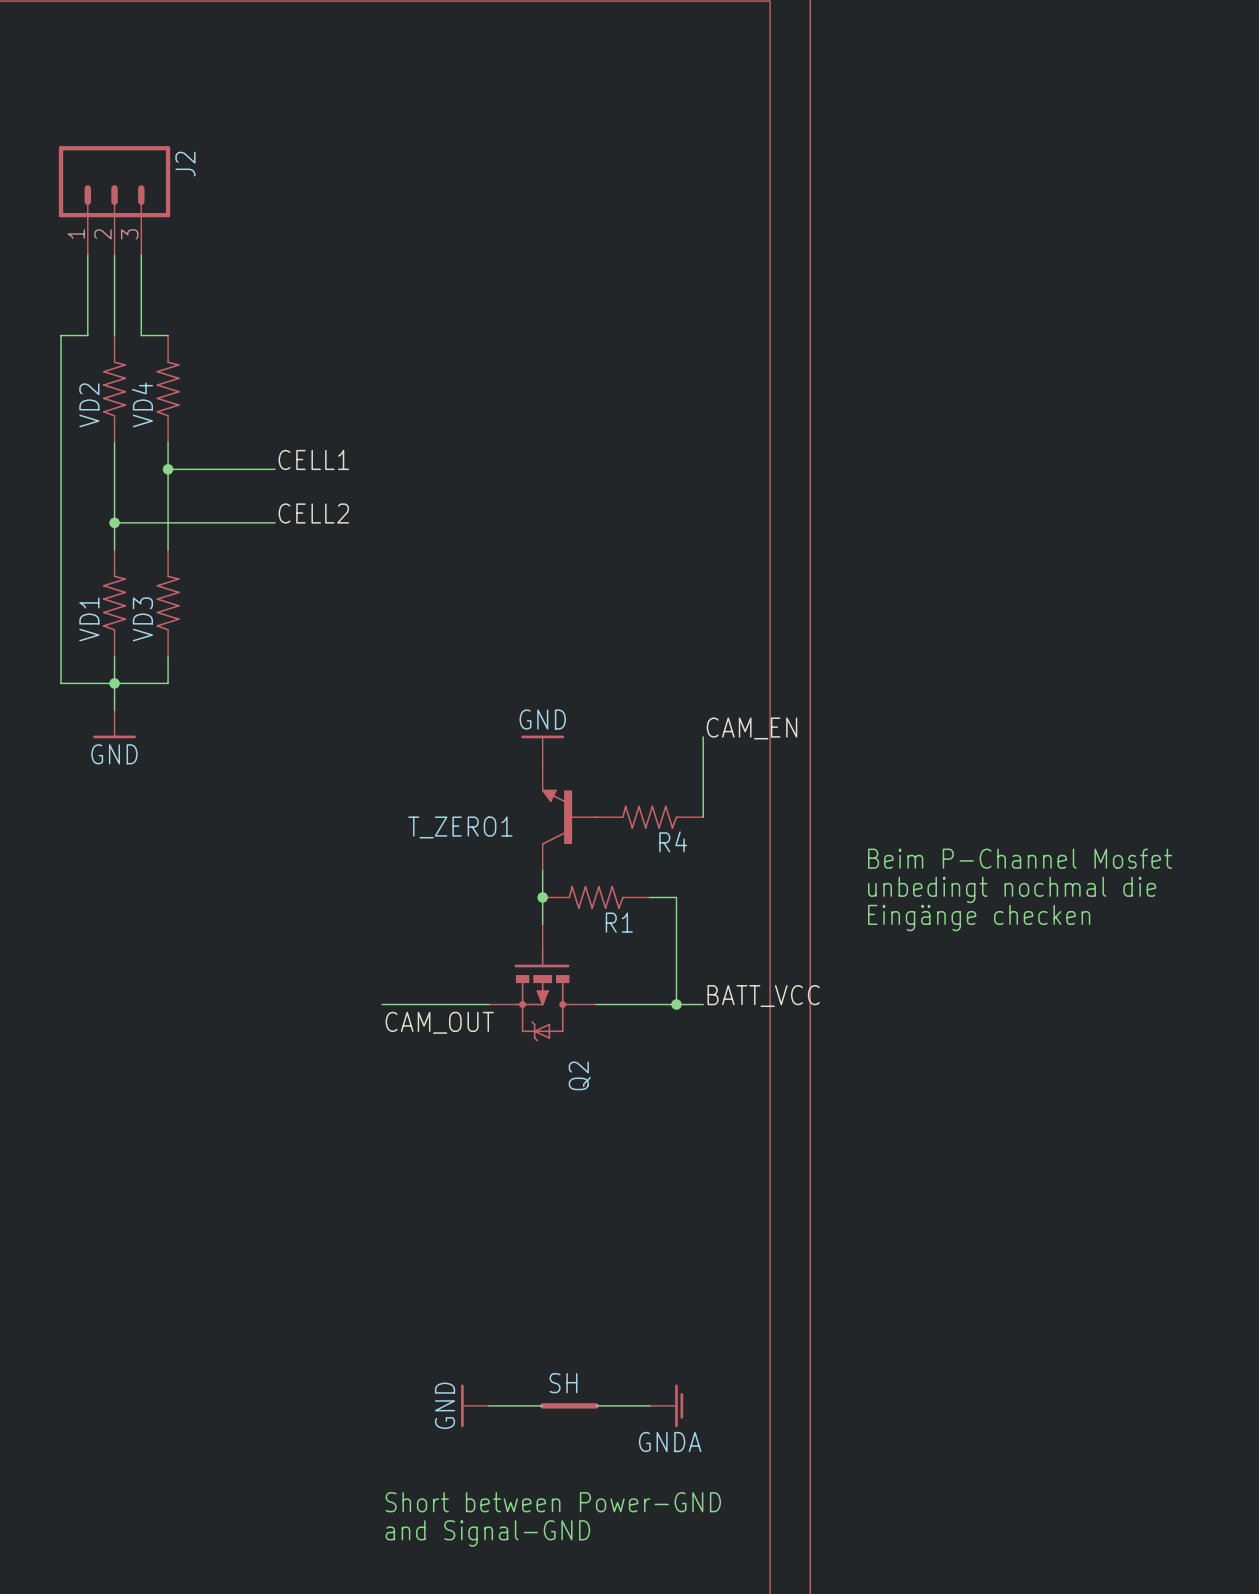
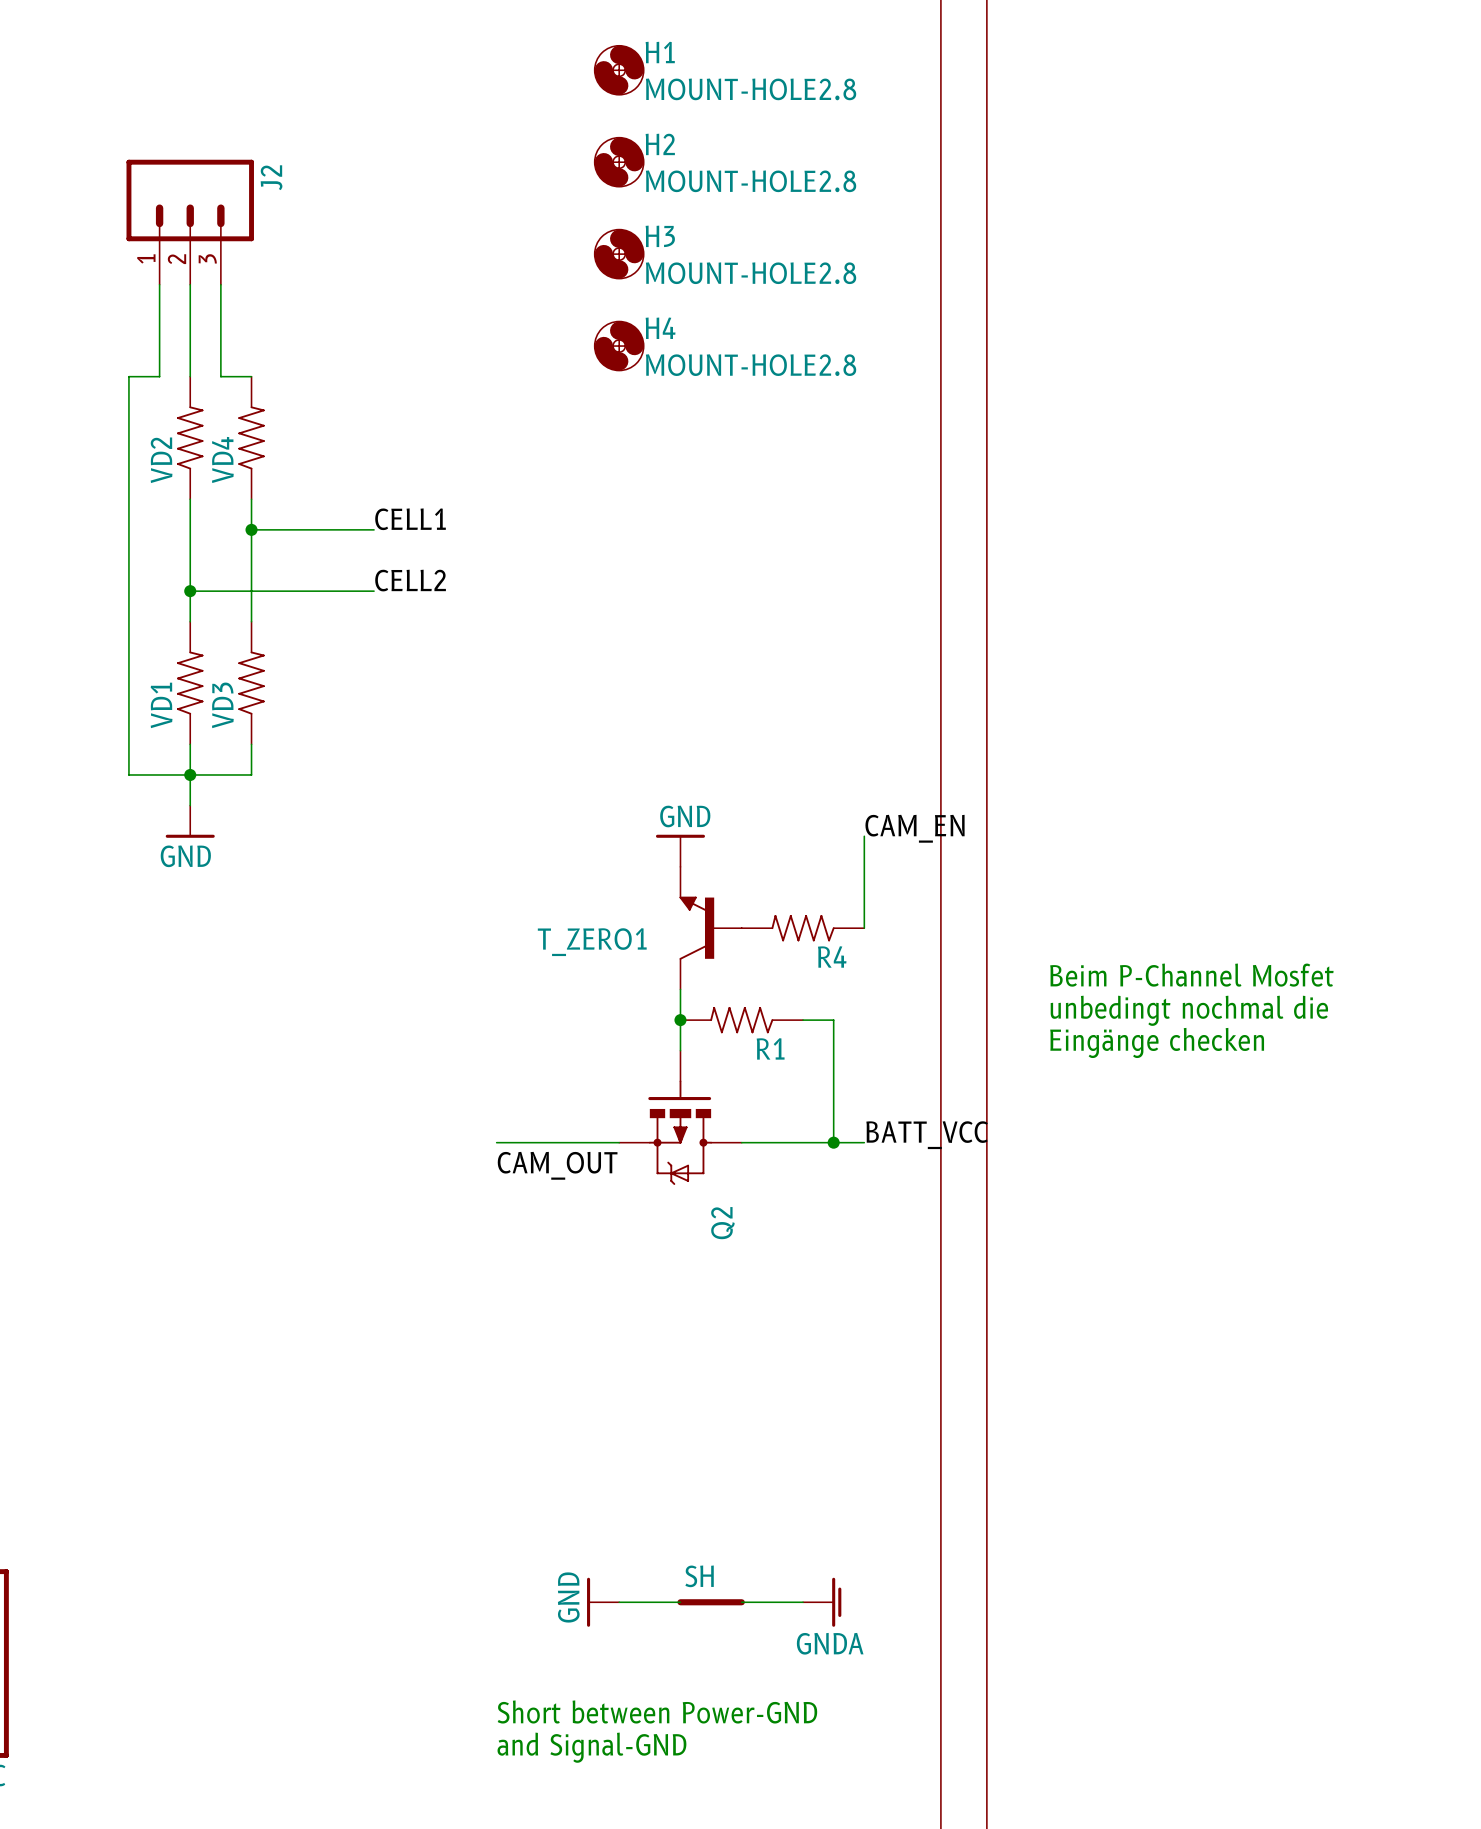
H1: none -> MOUNT-HOLE2.8 (619, 70)
H2: none -> MOUNT-HOLE2.8 (619, 162)
H3: none -> MOUNT-HOLE2.8 (619, 254)
H4: none -> MOUNT-HOLE2.8 (619, 346)

